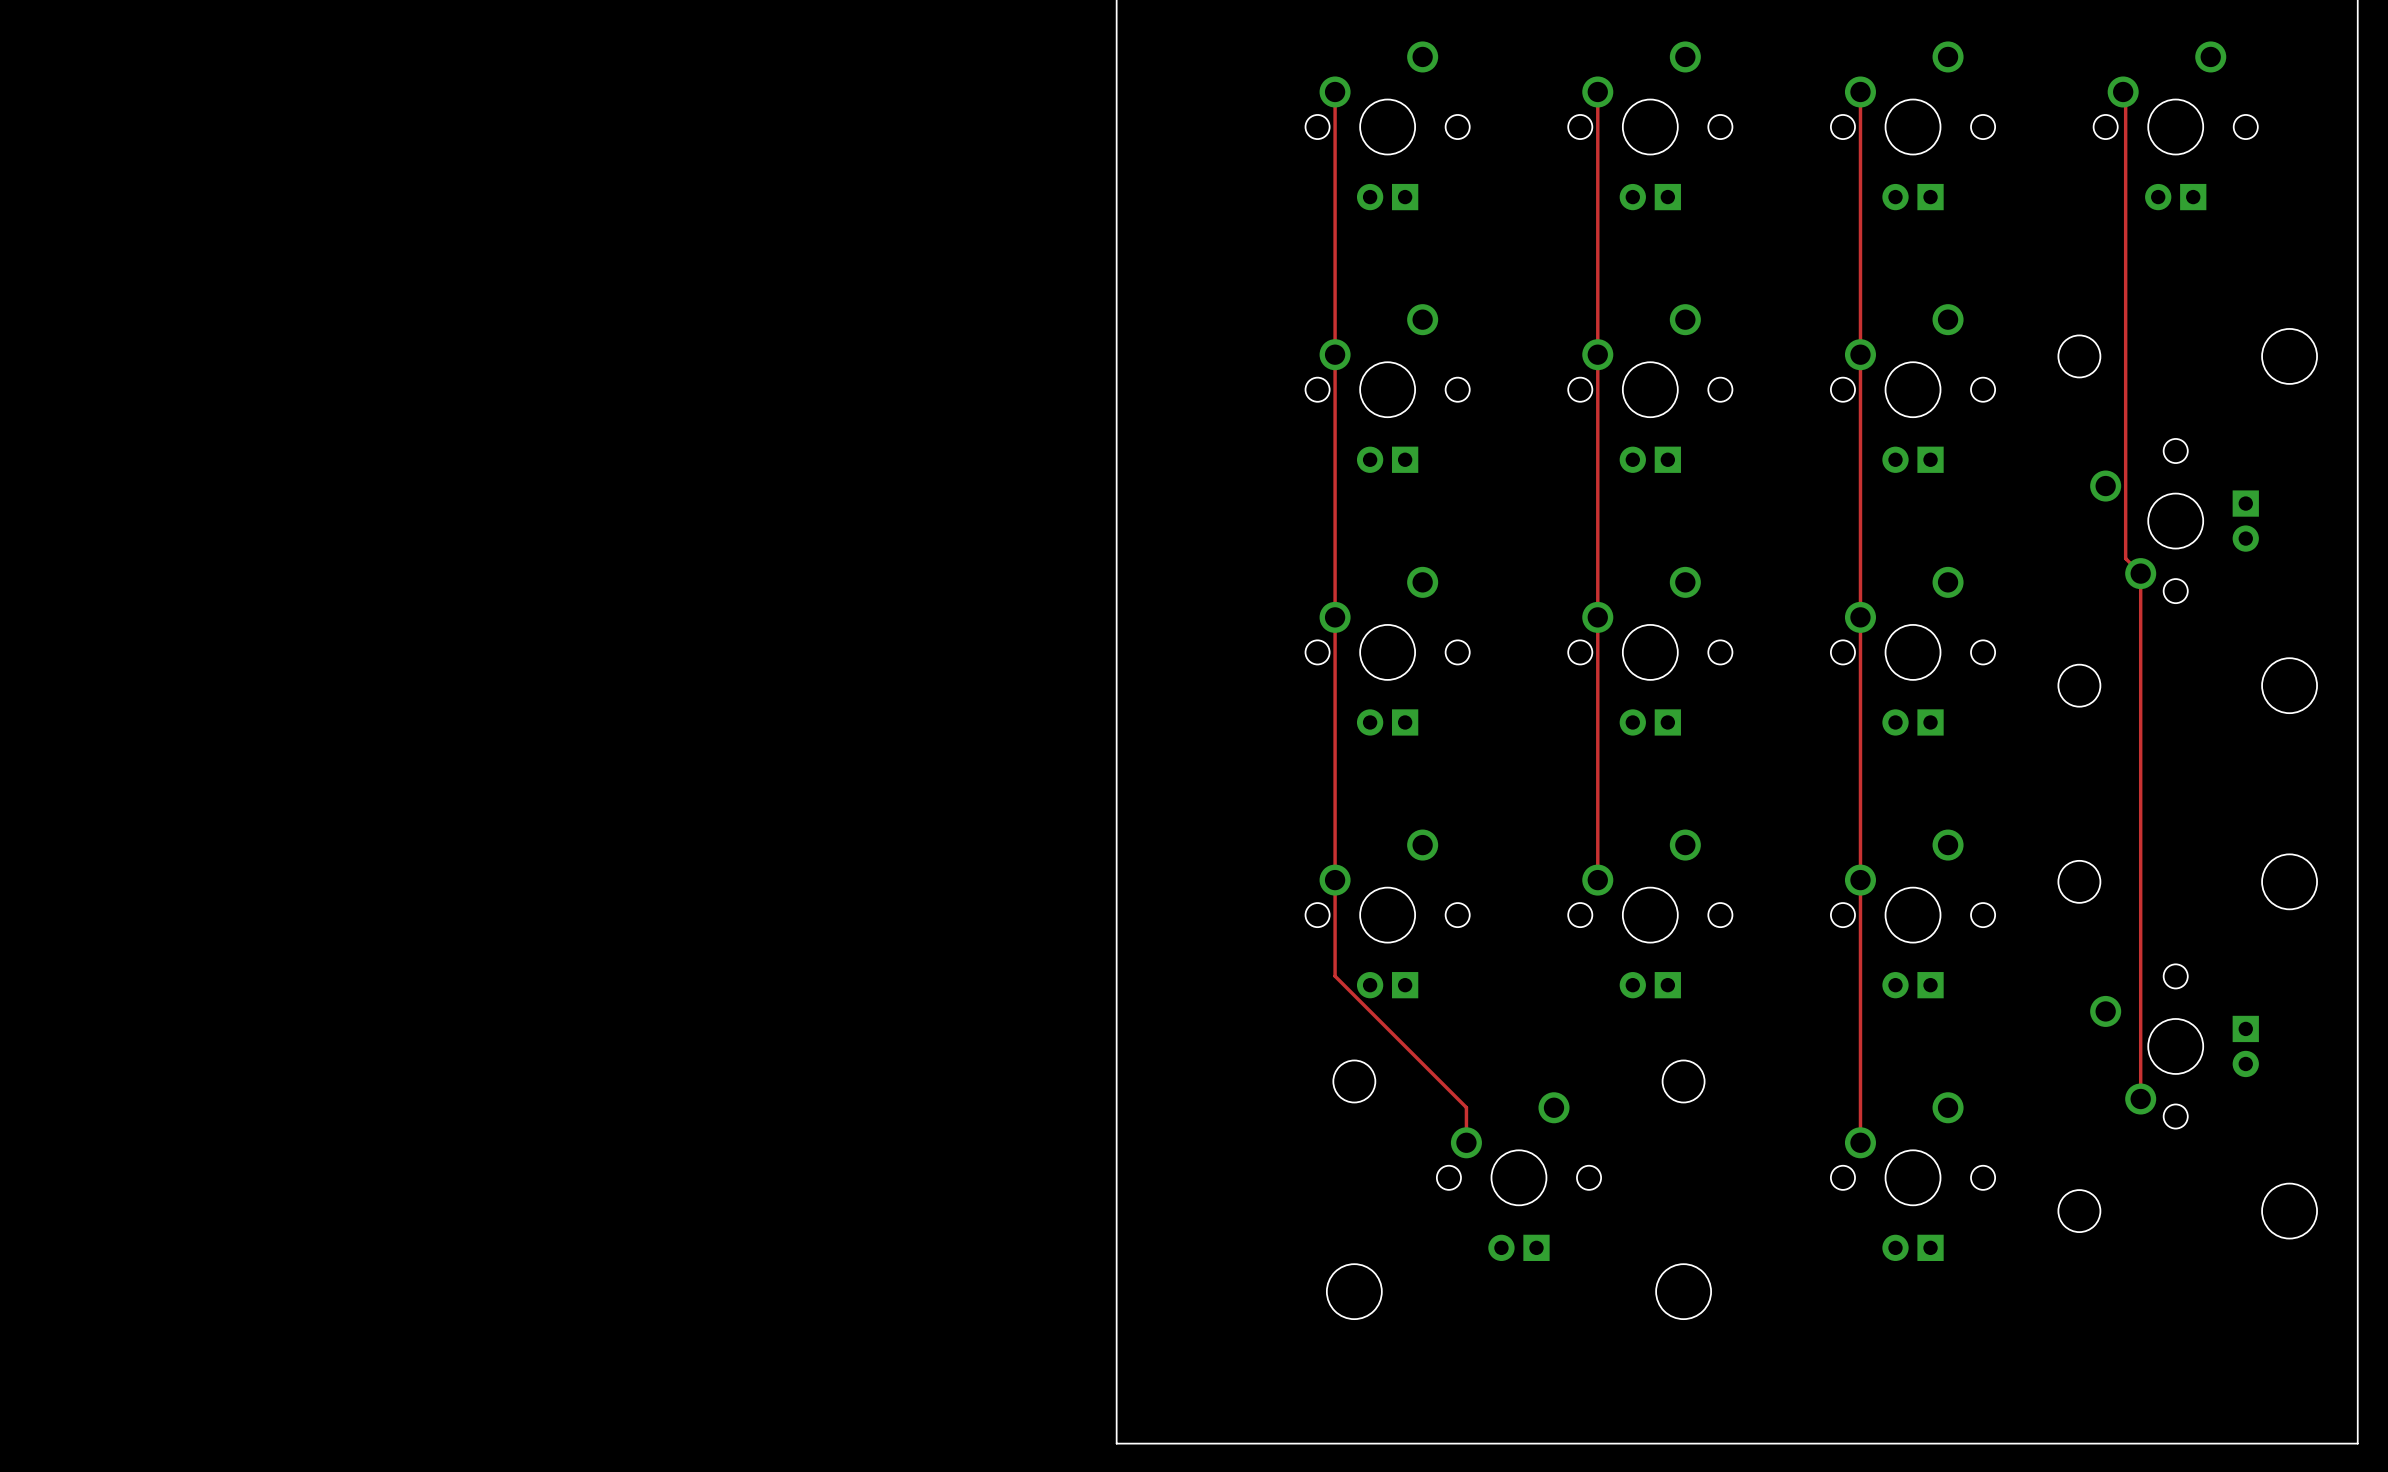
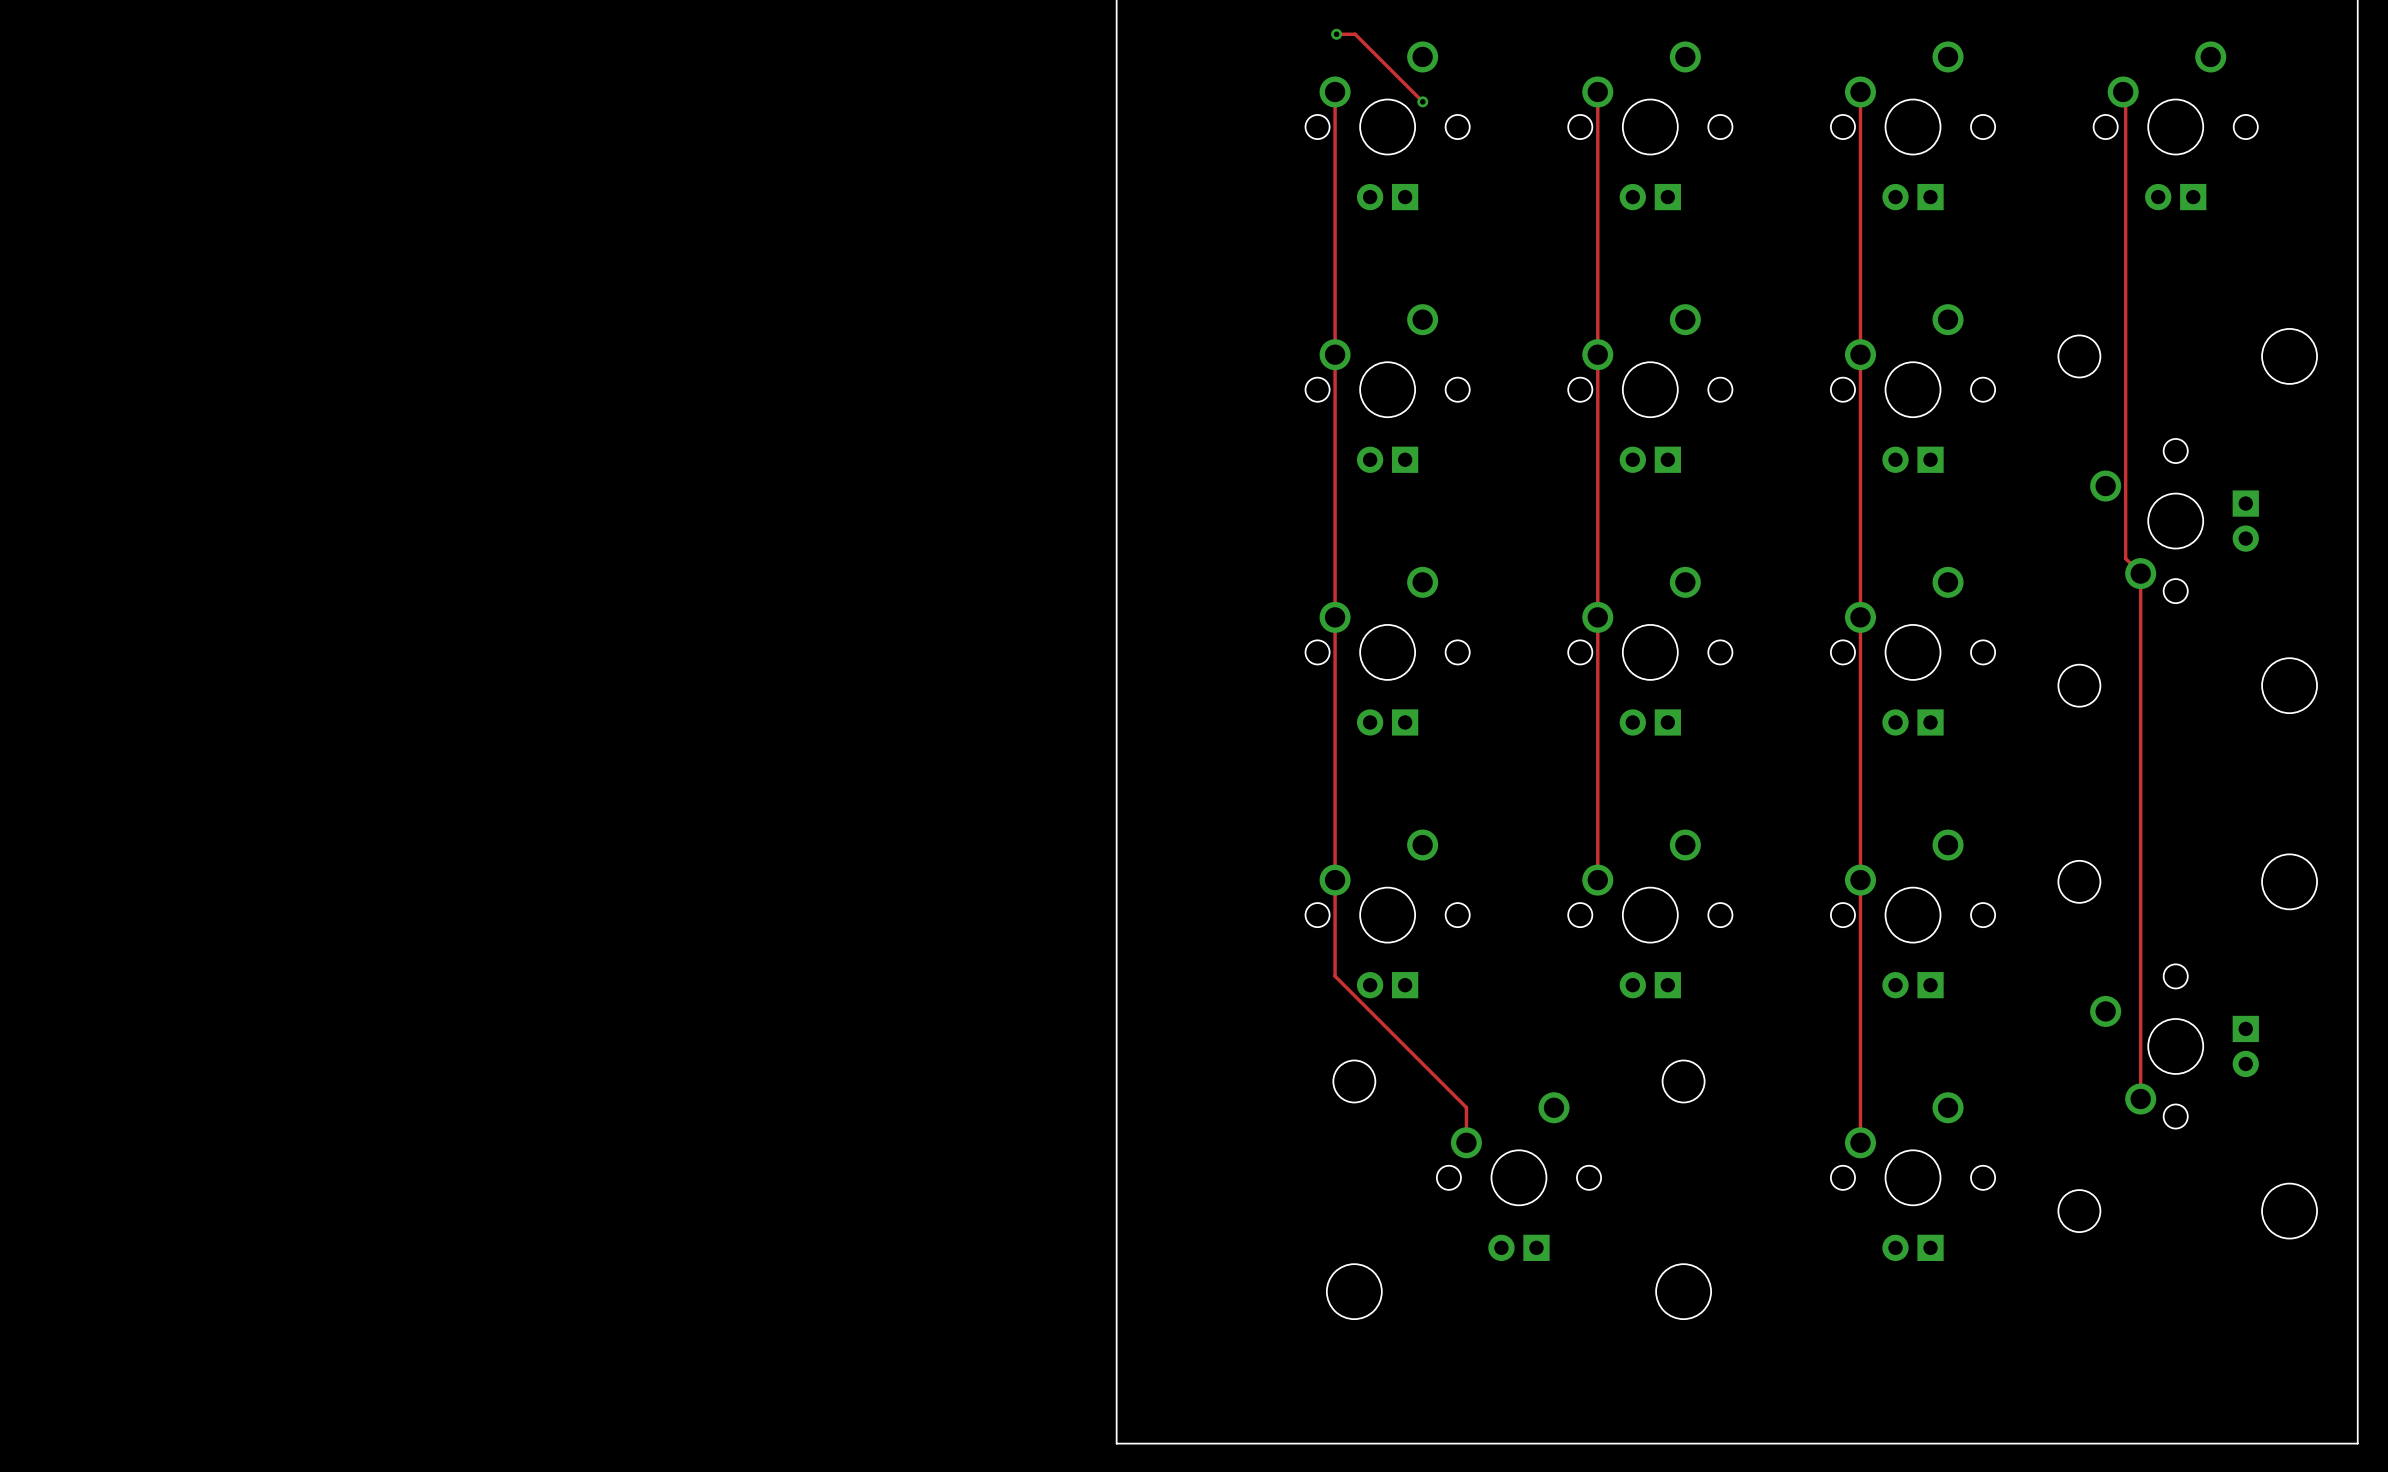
track: none -> (1336, 34) (1355, 34) (1422, 101)
via: none -> (1336, 34)
via: none -> (1422, 101)

